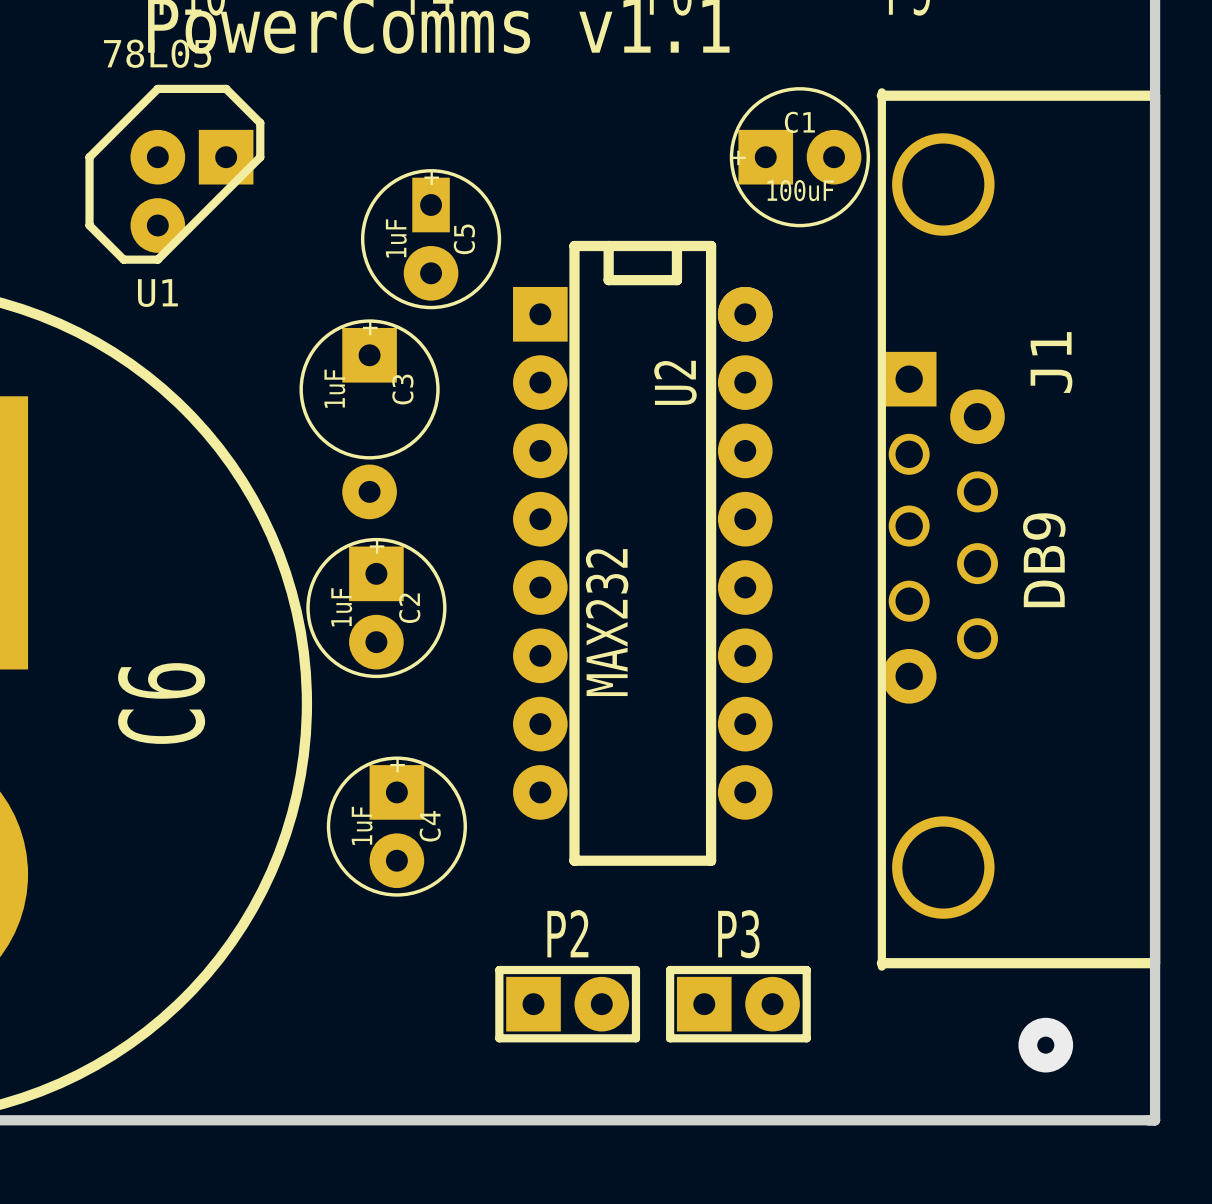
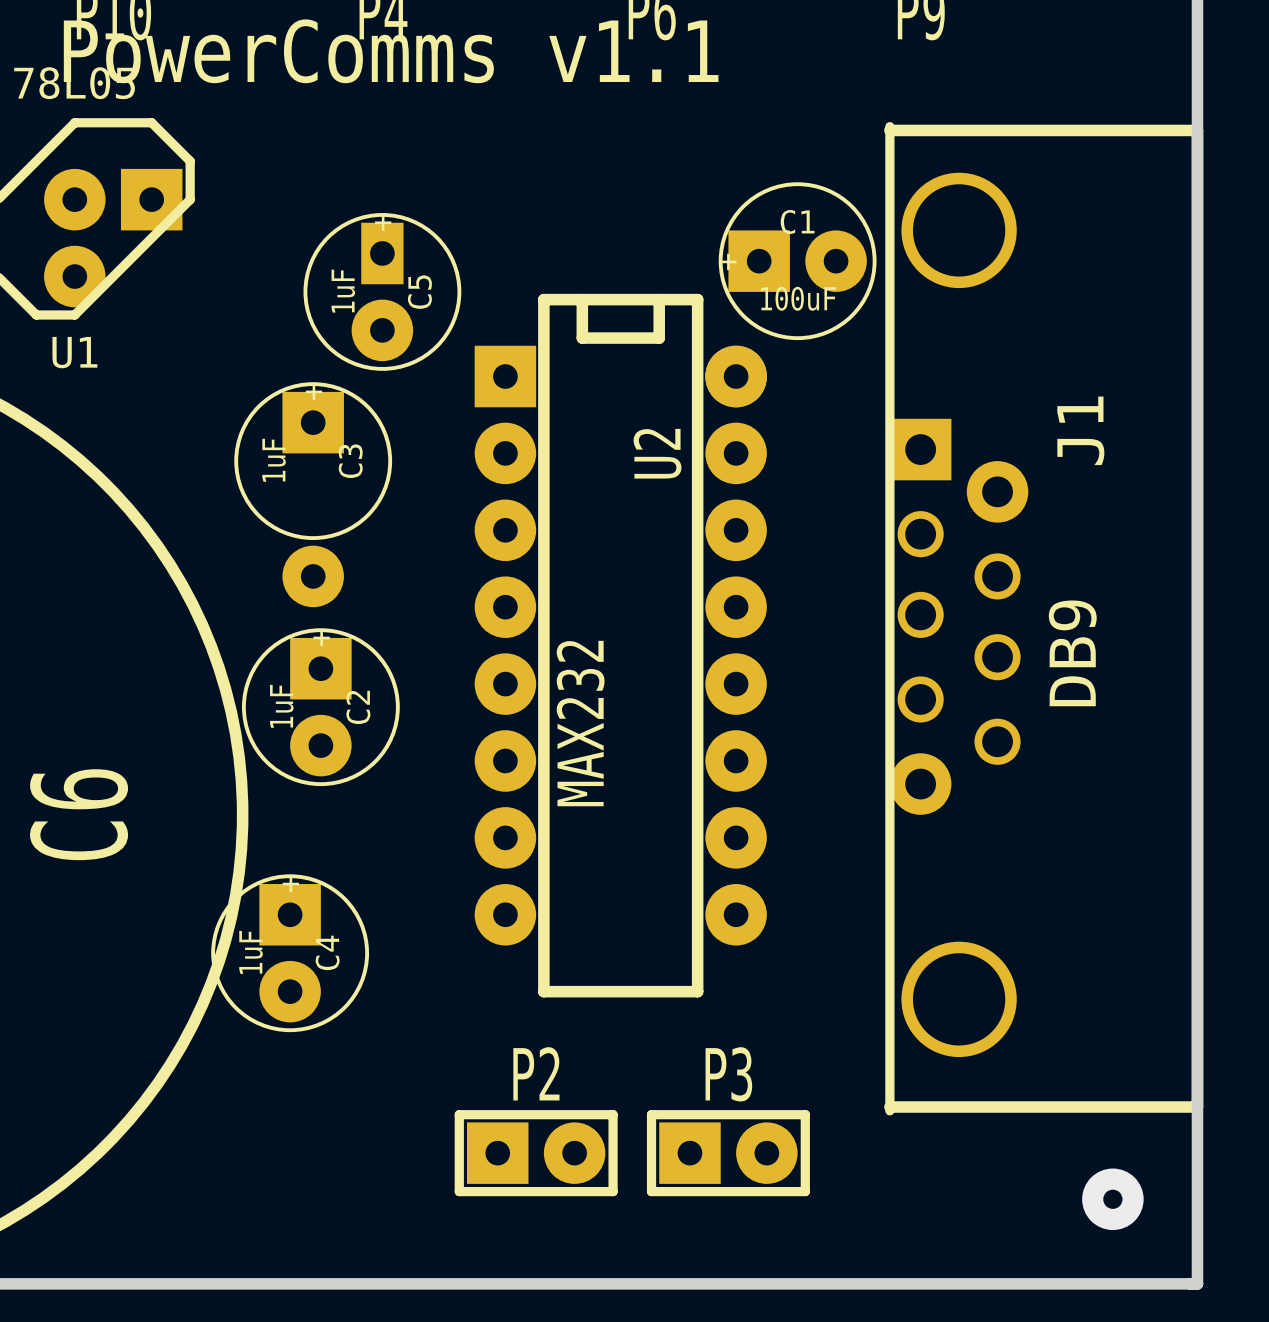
C1 position: (799, 157) -> (797, 261)
C4 position: (396, 826) -> (290, 953)
via position: (1045, 1045) -> (1112, 1199)

